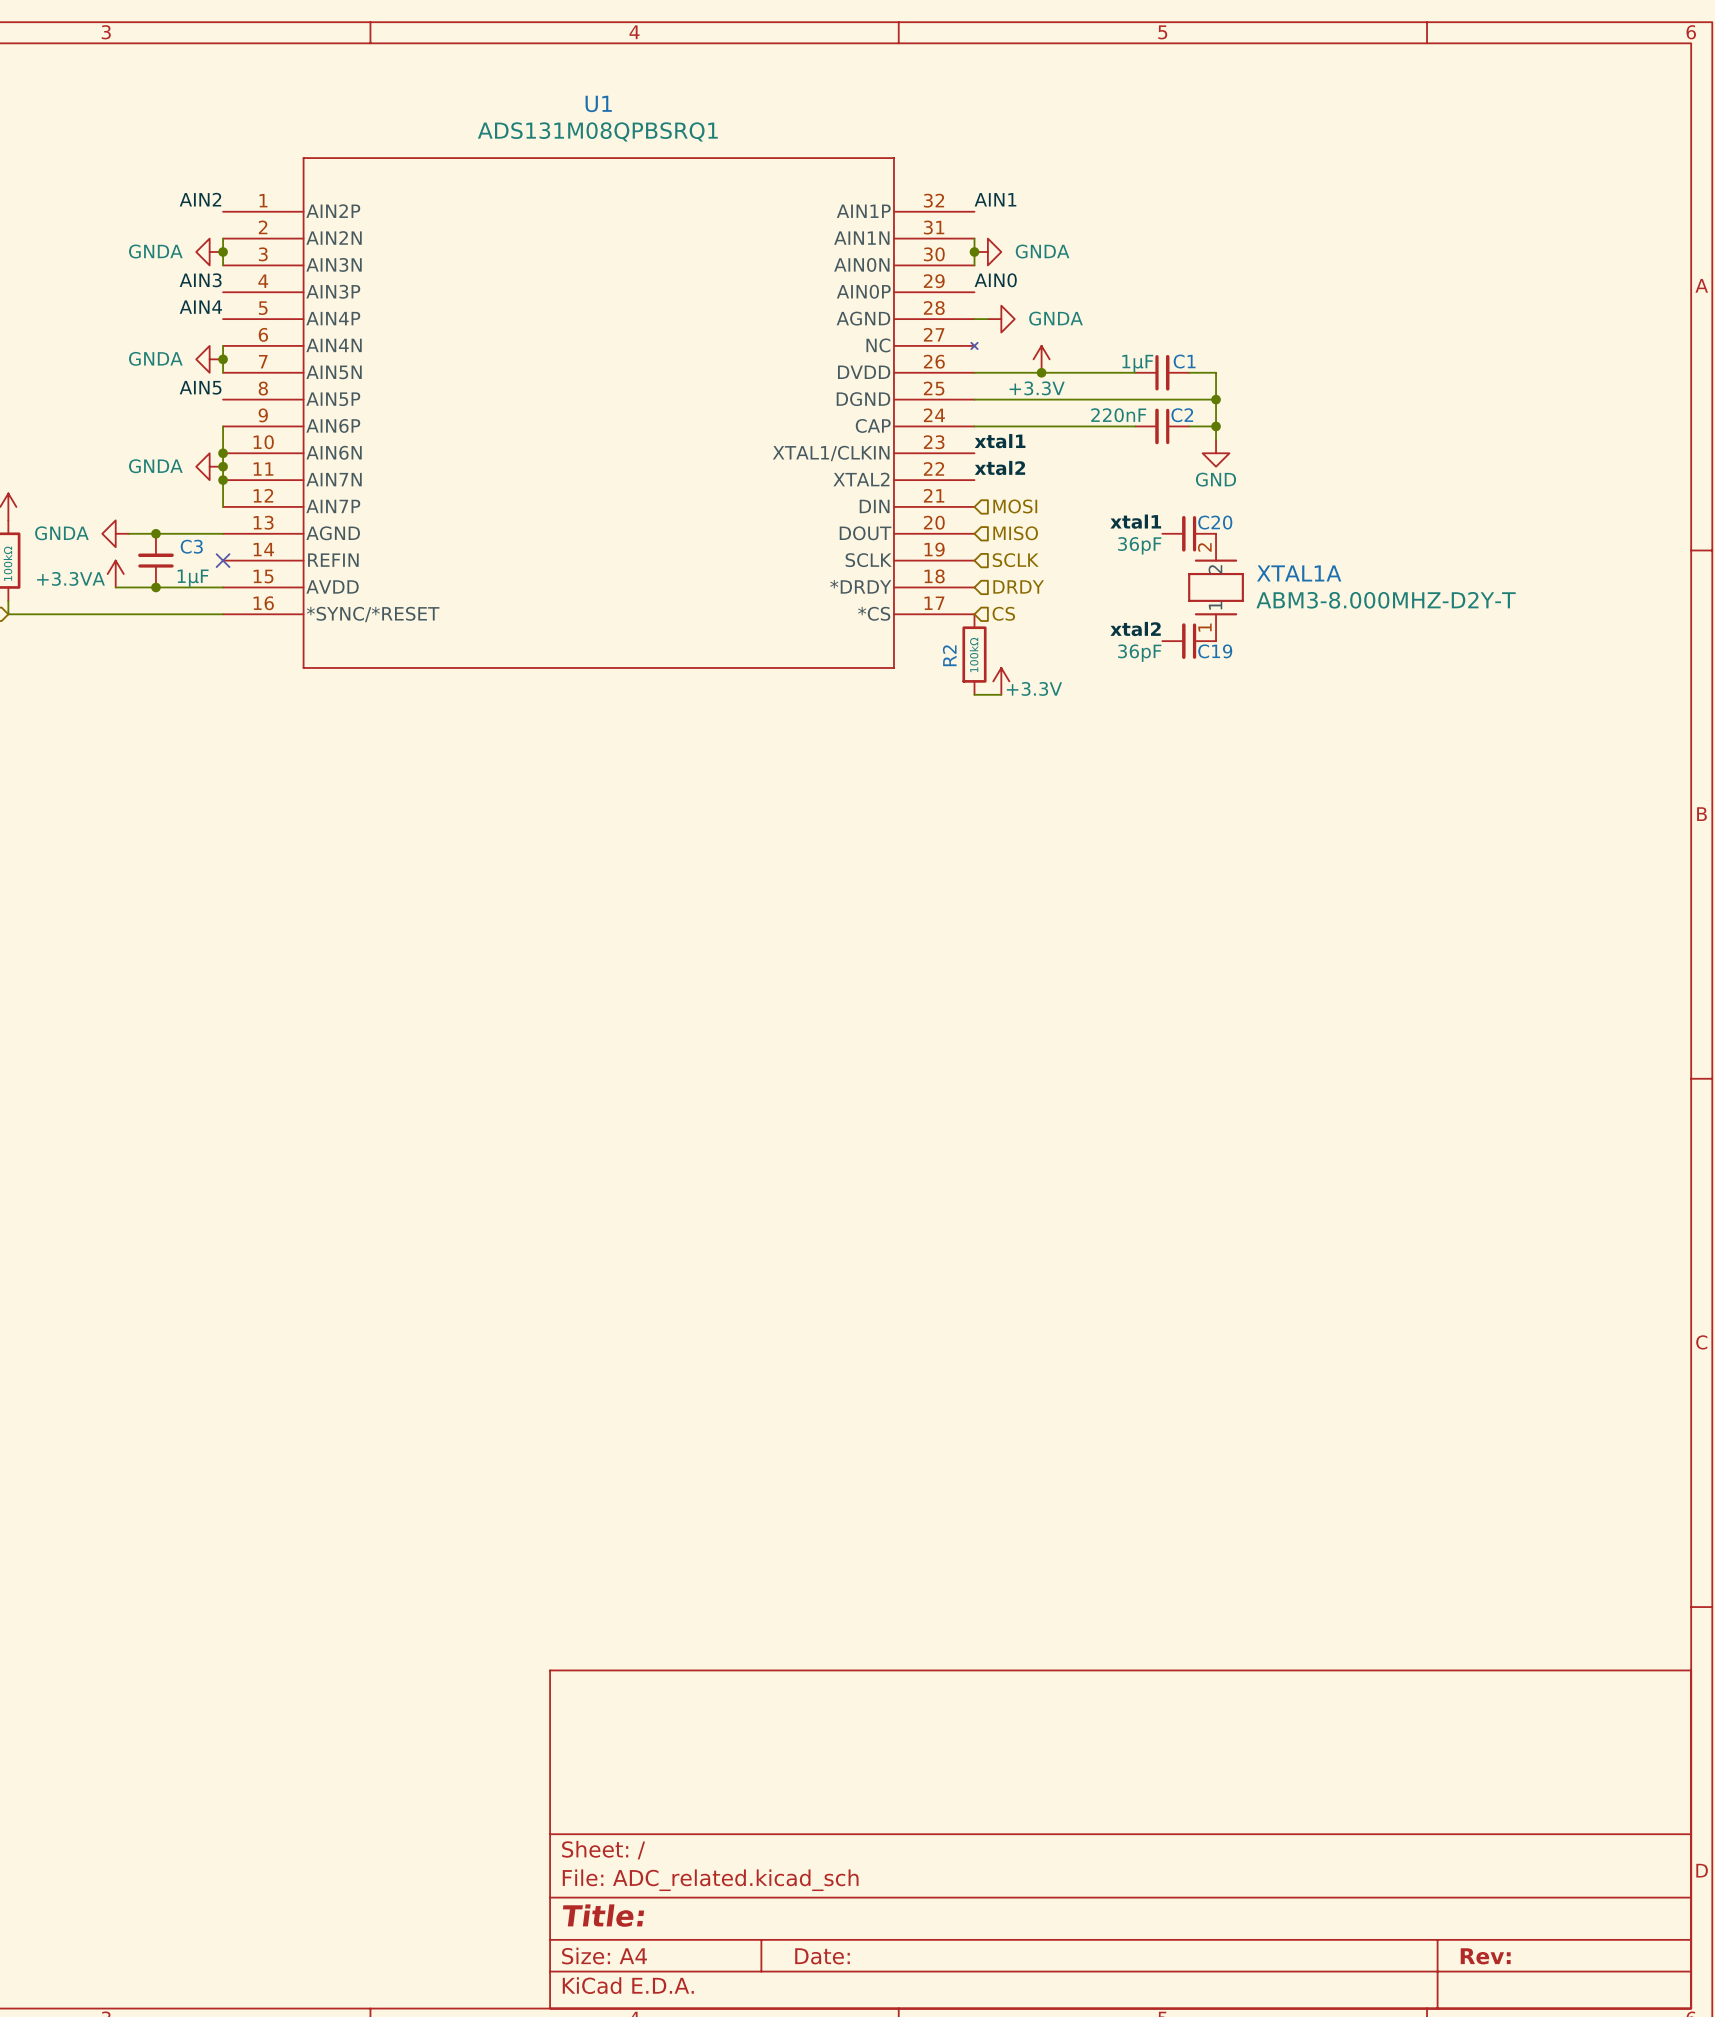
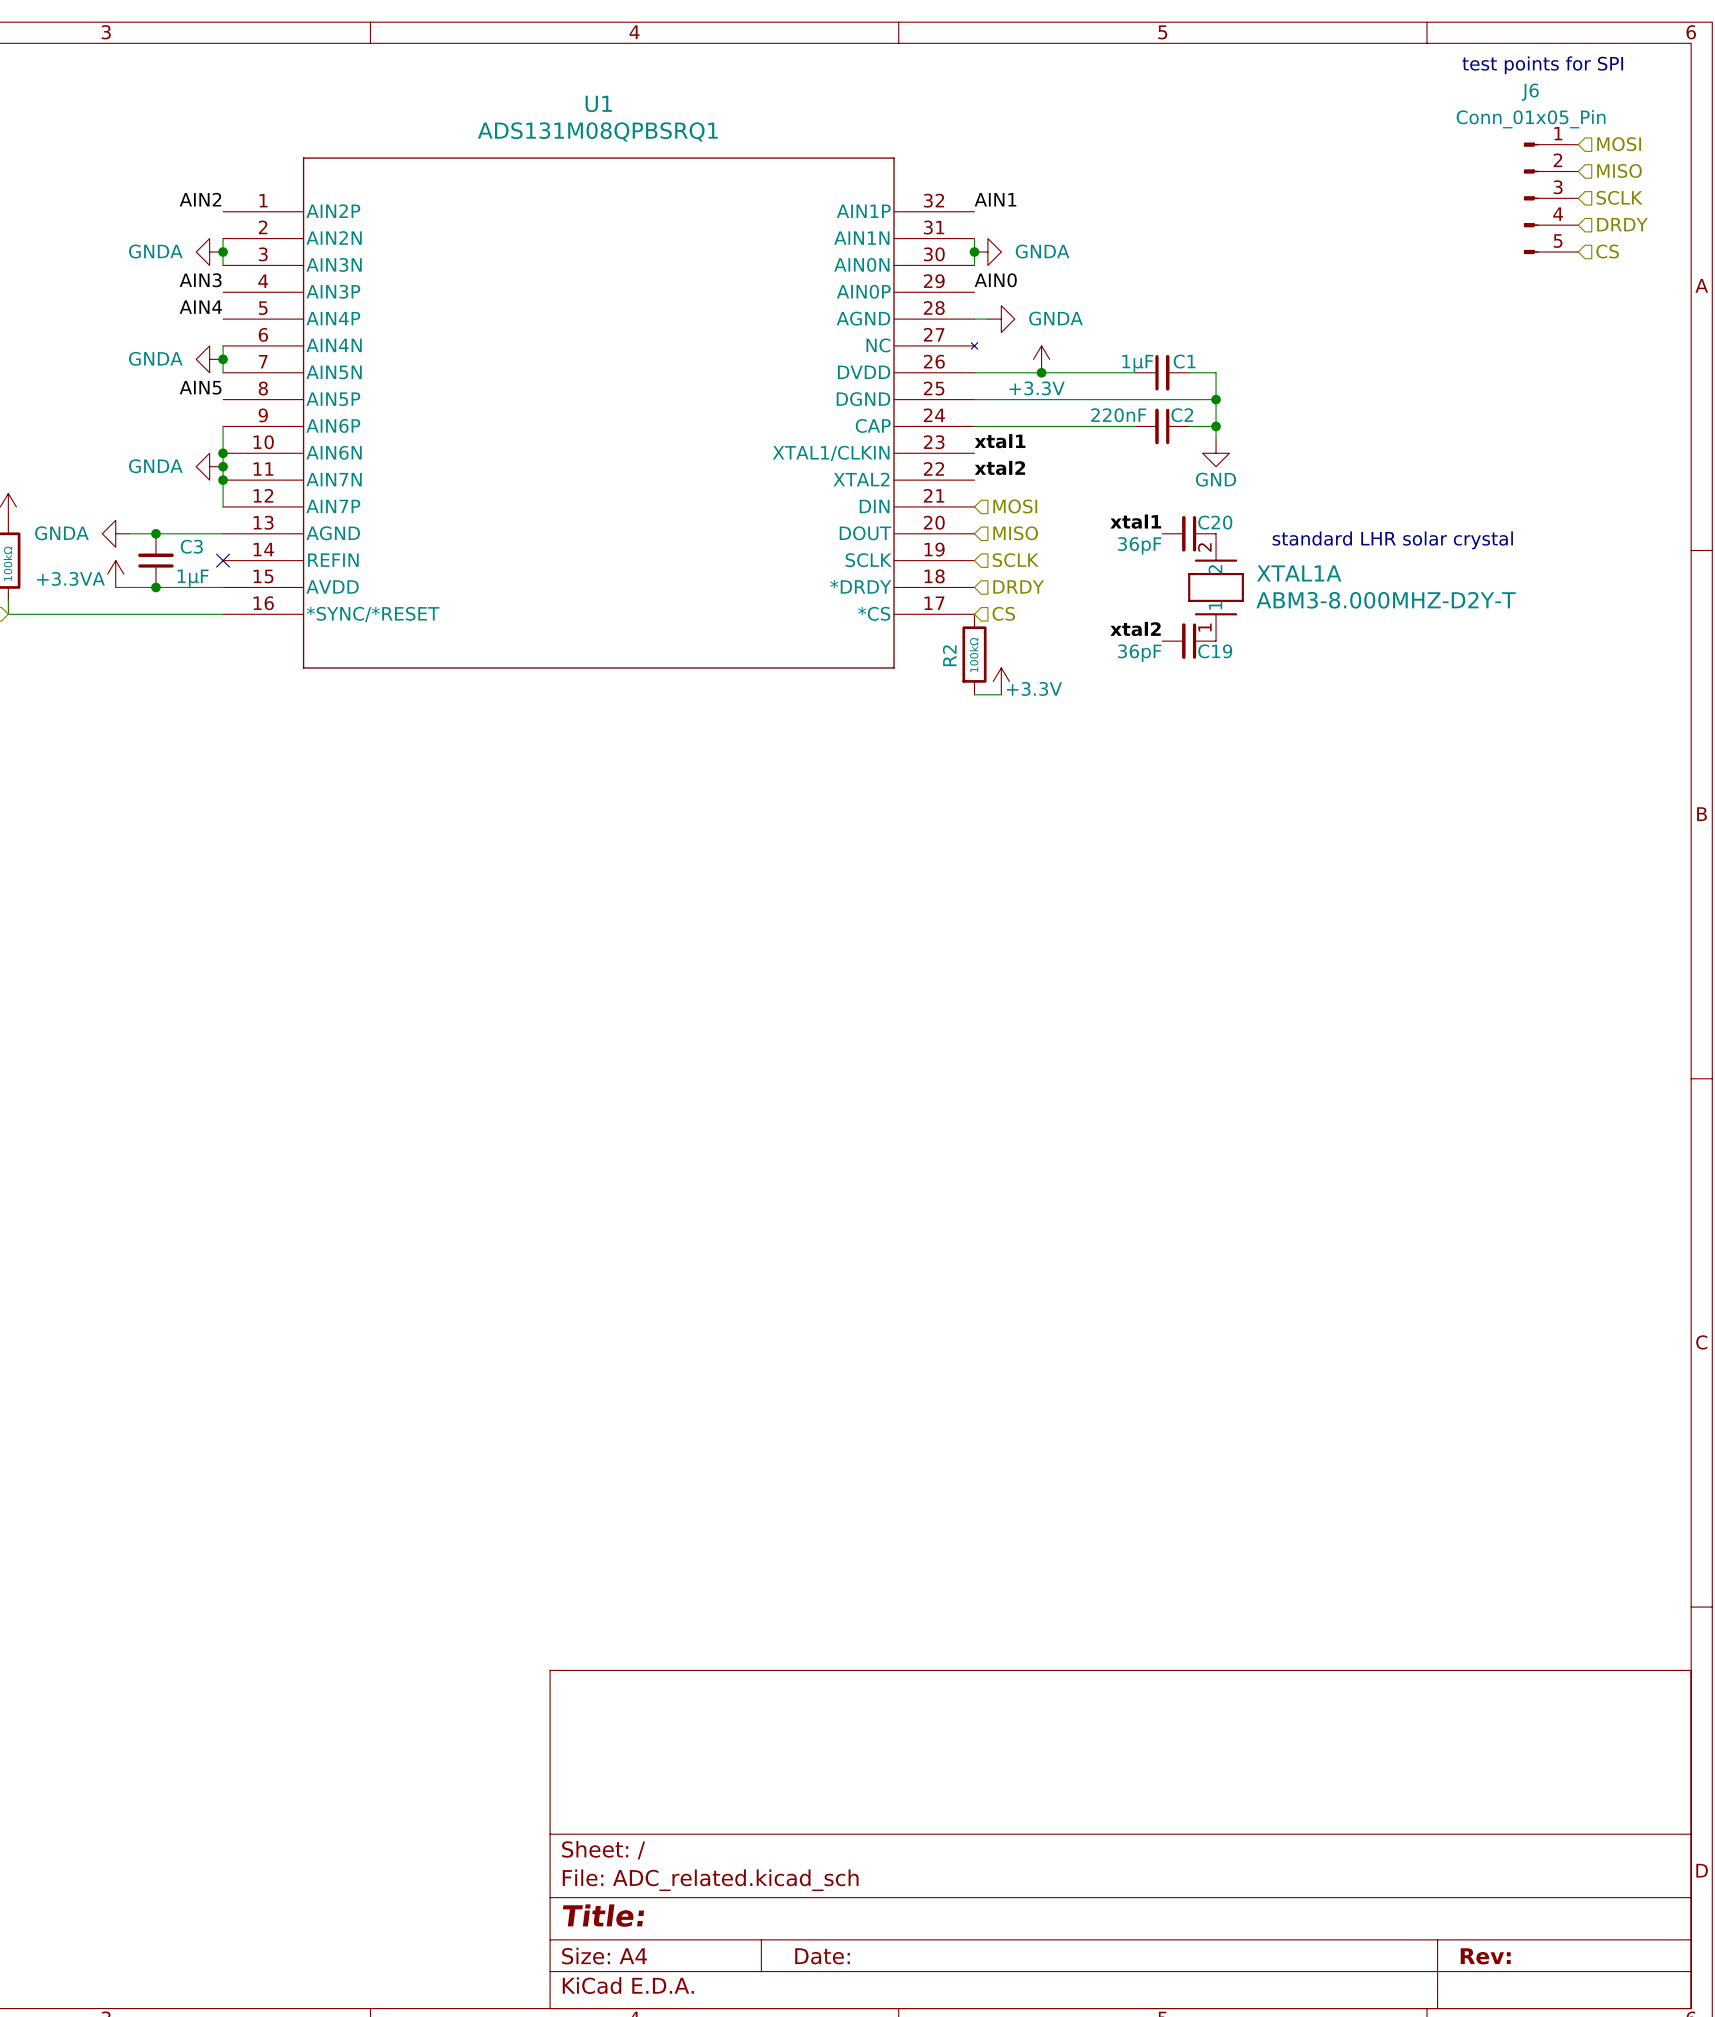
text: none -> test points for SPI (1542, 65)
hierarchical label: none -> MOSI (1619, 144)
hierarchical label: none -> MISO (1619, 171)
hierarchical label: none -> SCLK (1619, 197)
J6: none -> Conn_01x05_Pin (1551, 198)
hierarchical label: none -> DRDY (1622, 224)
hierarchical label: none -> CS (1607, 251)
text: none -> standard LHR solar crystal (1392, 540)

